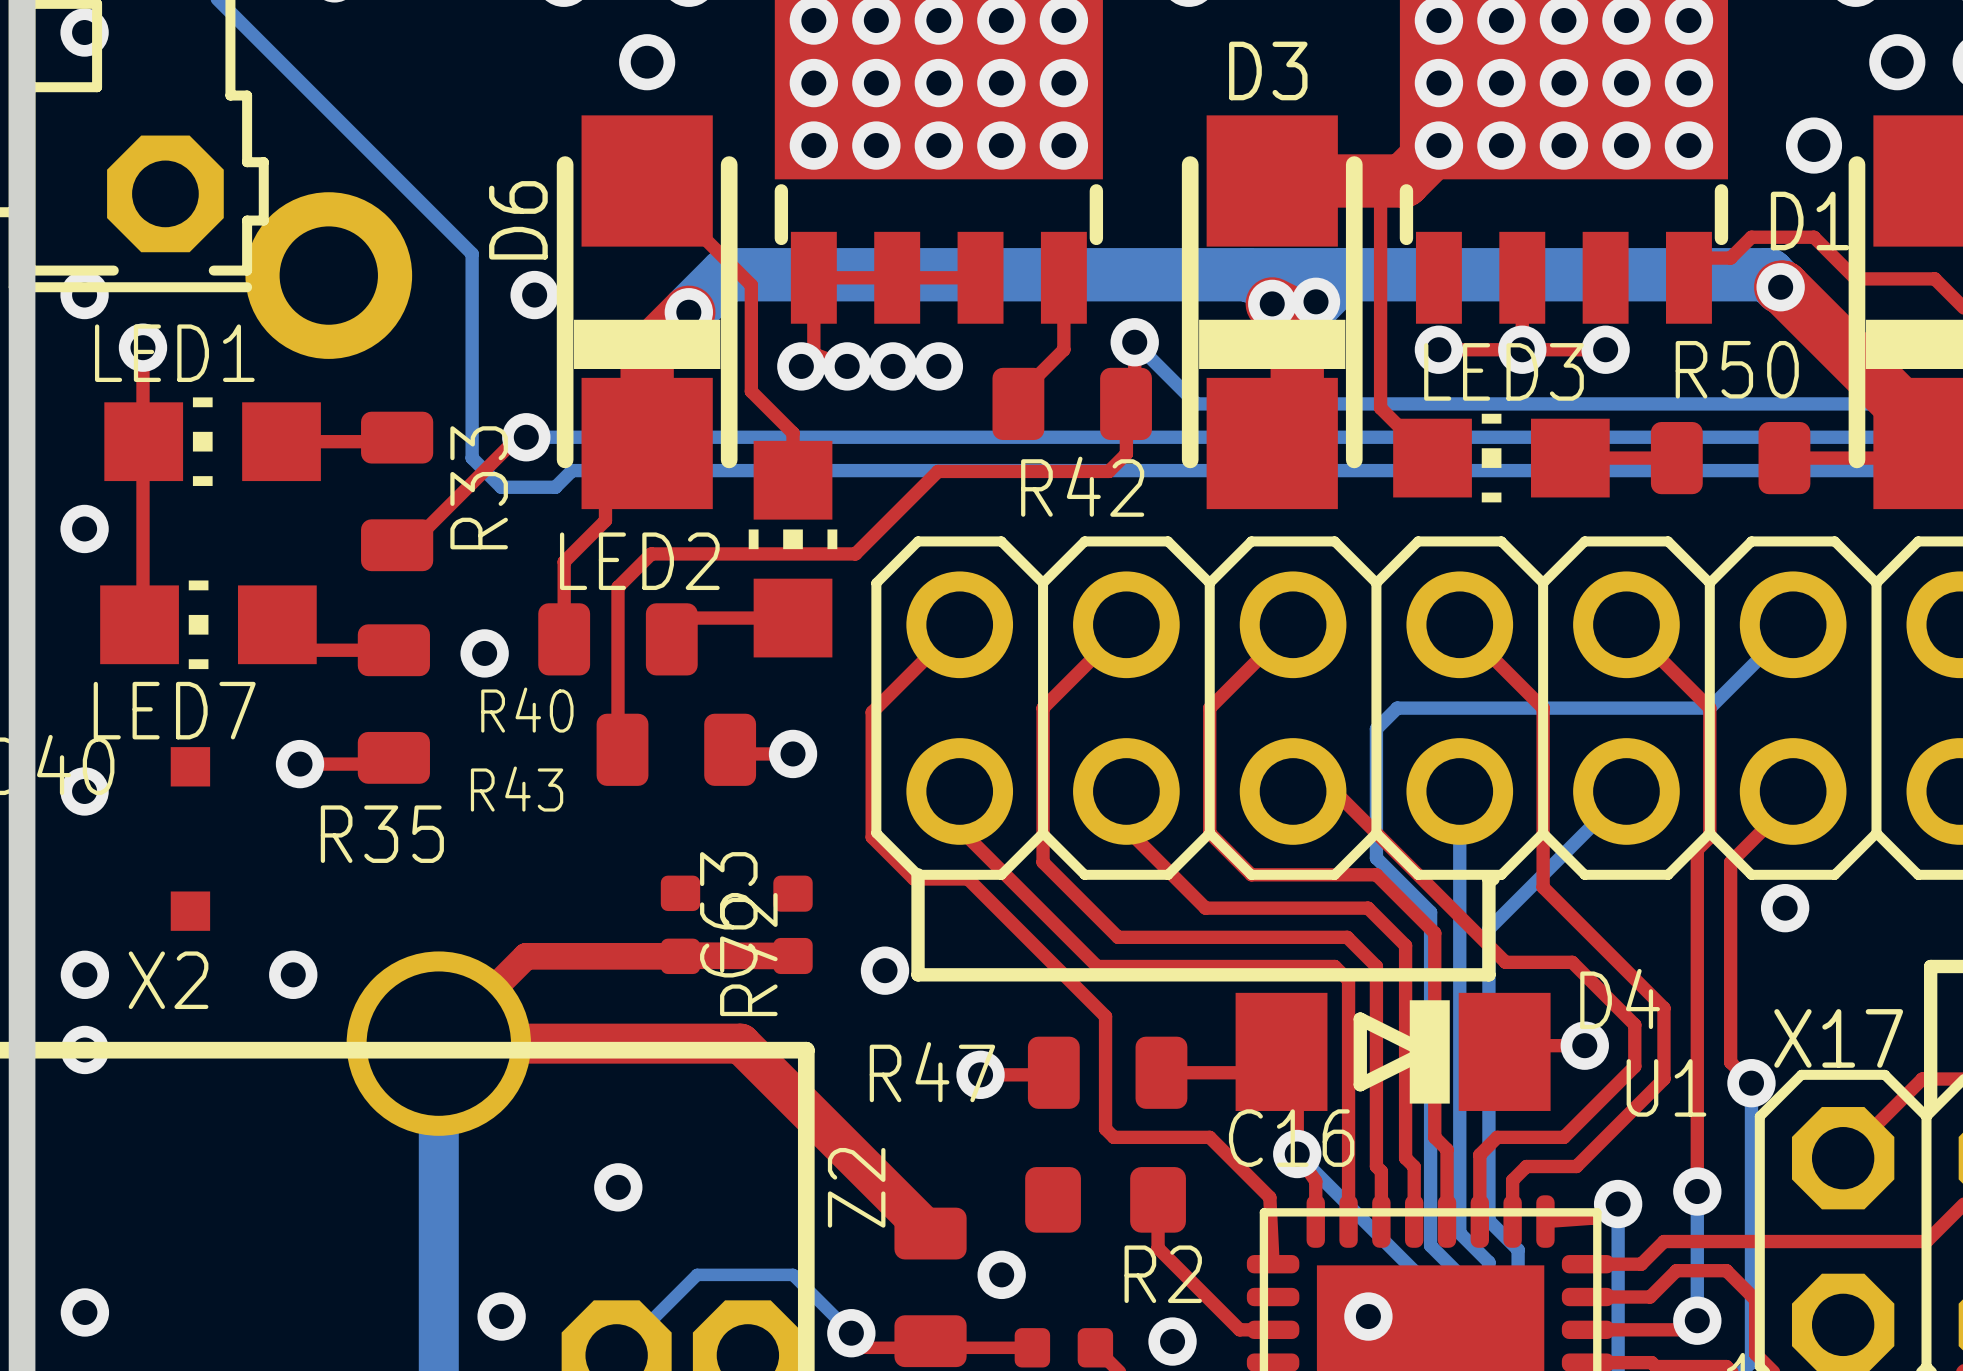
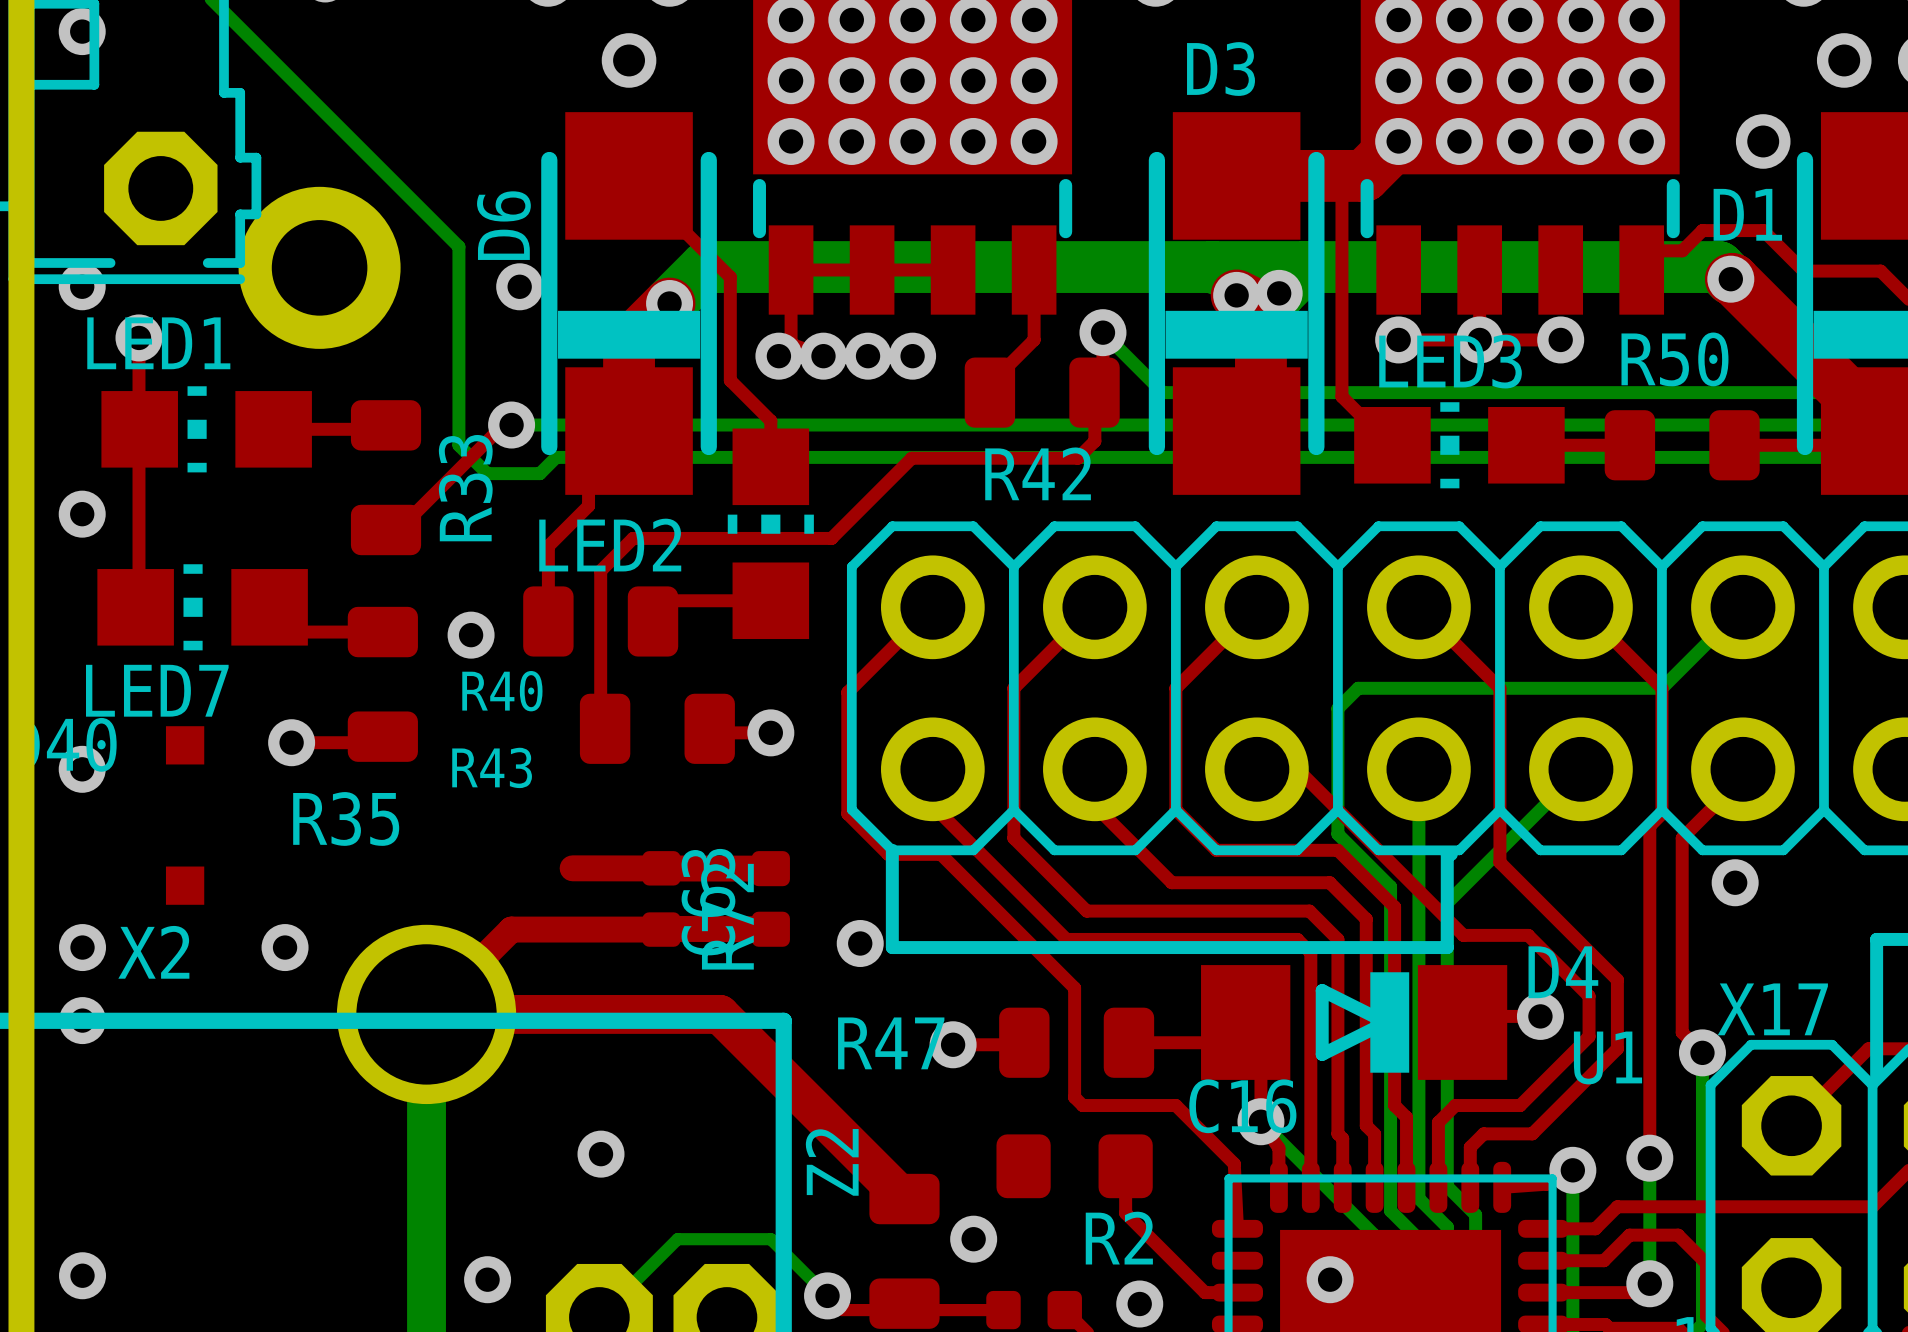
R35 name position: R35 (382, 834) -> R35 (346, 818)
top track: none -> (572, 868) (770, 868)

